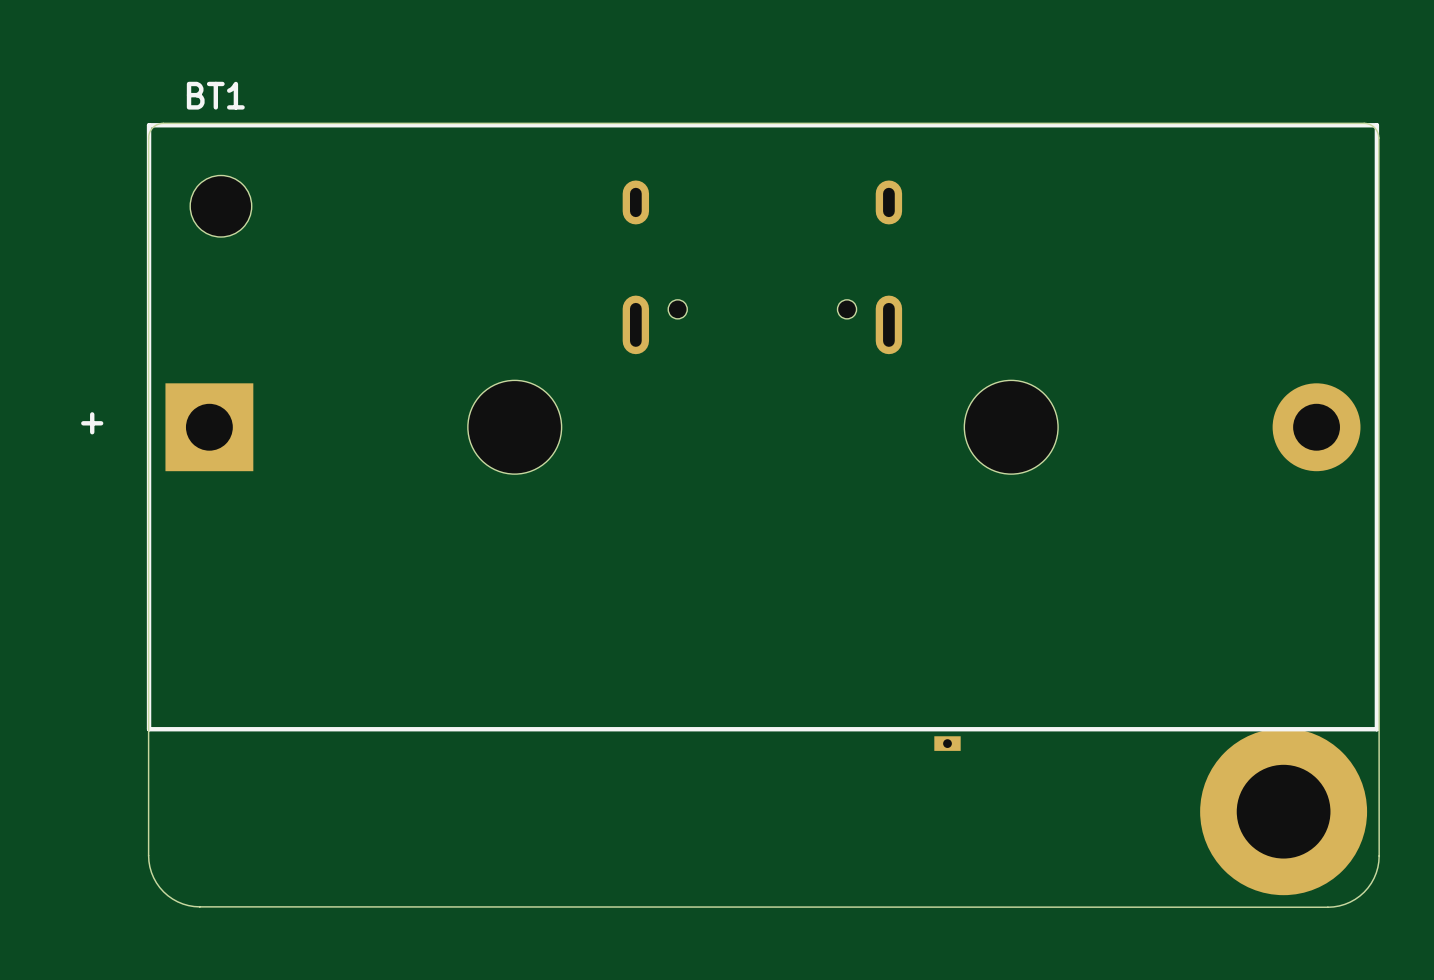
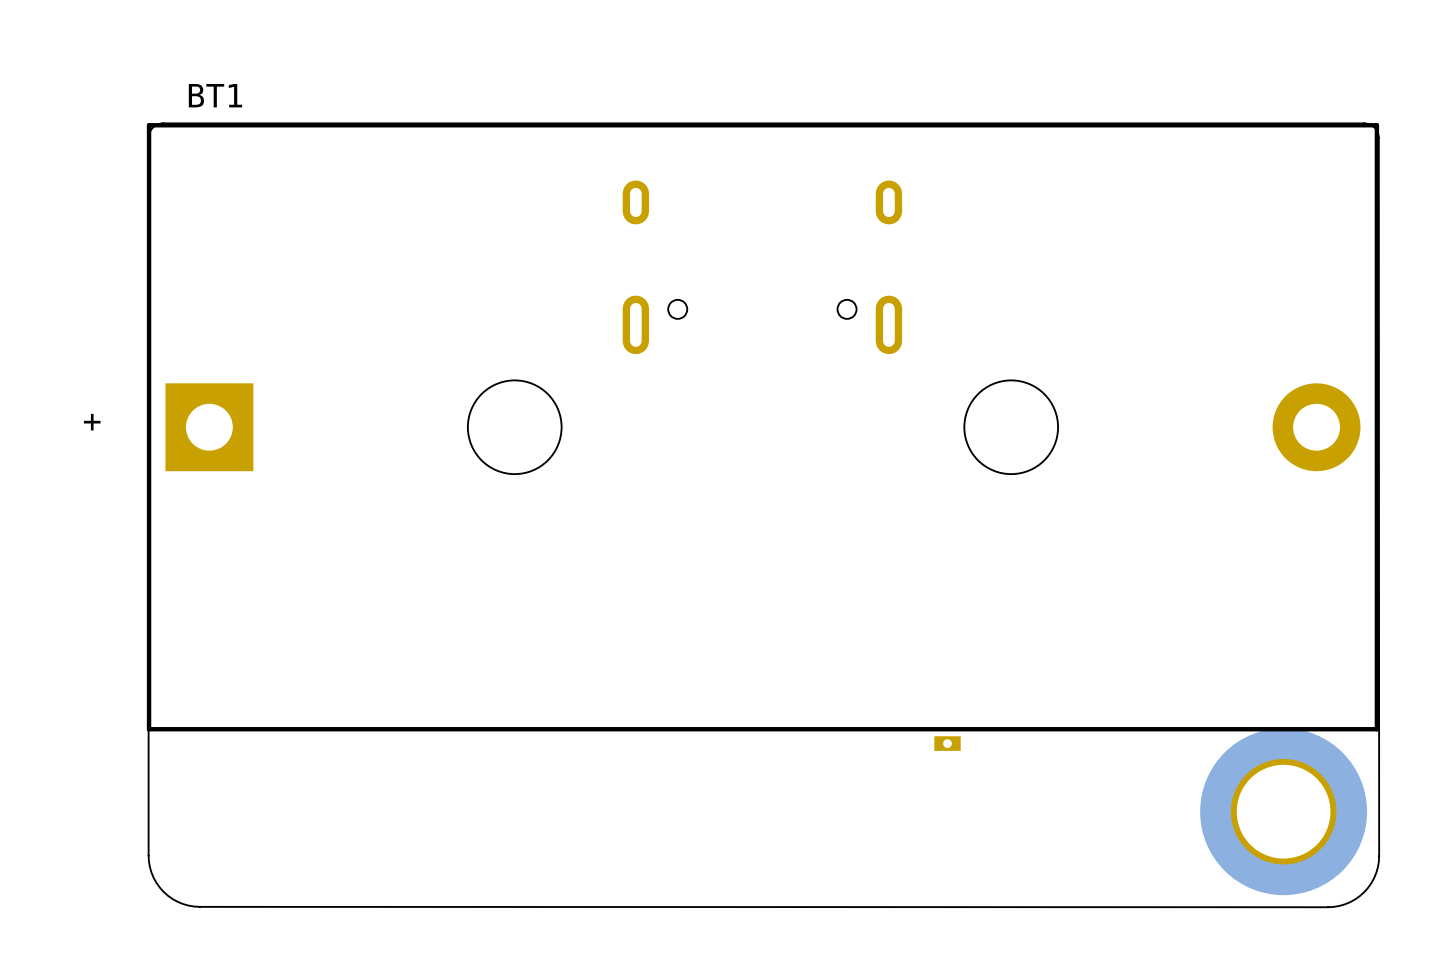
part: (220, 206) -> none

